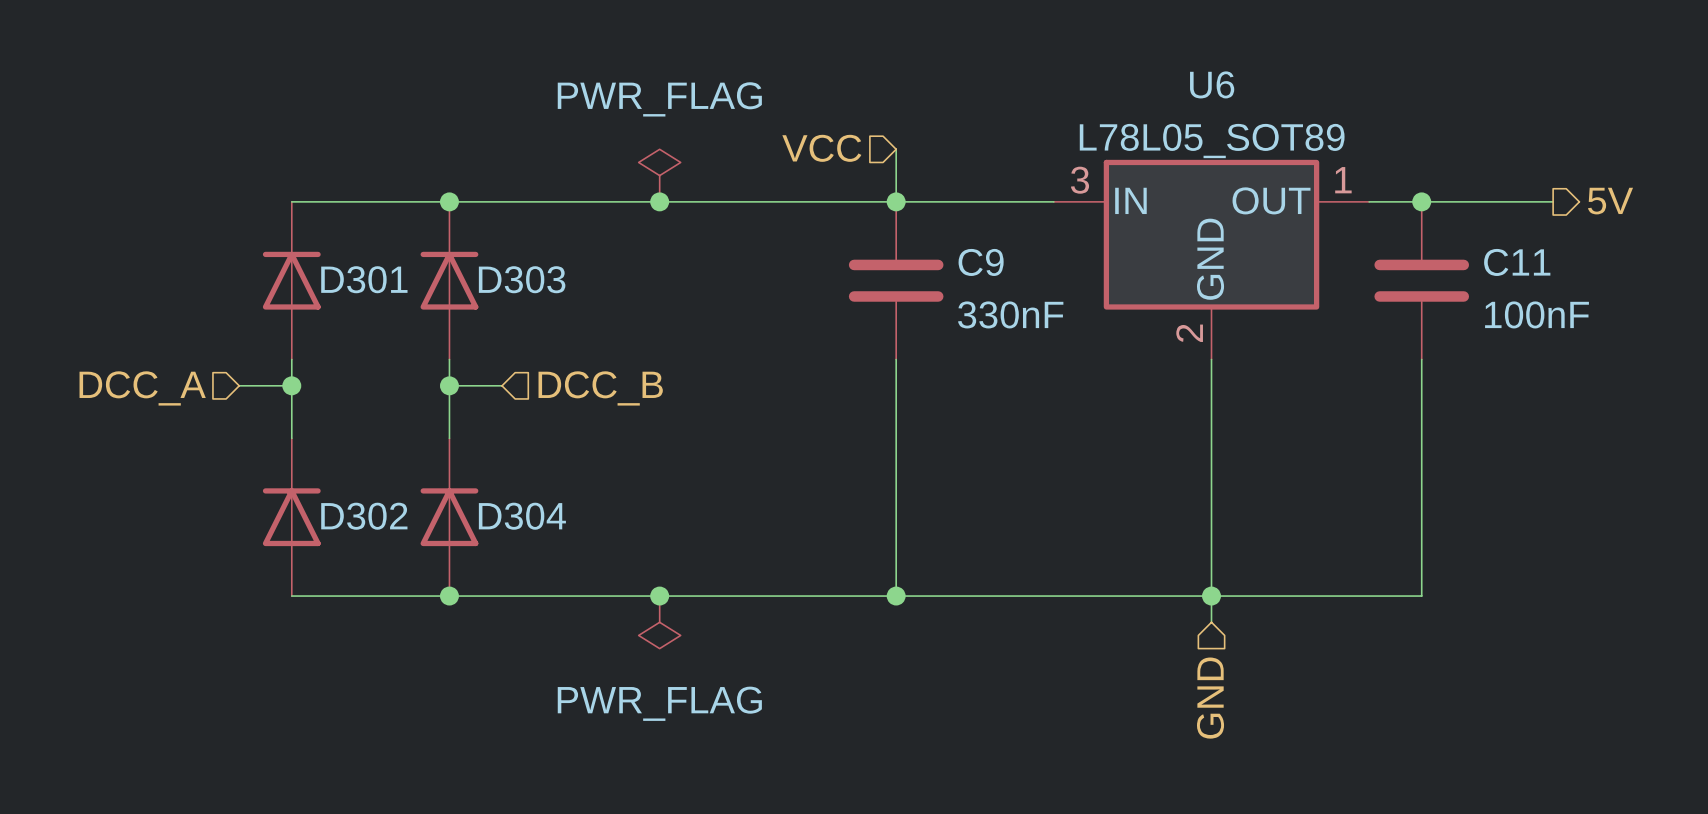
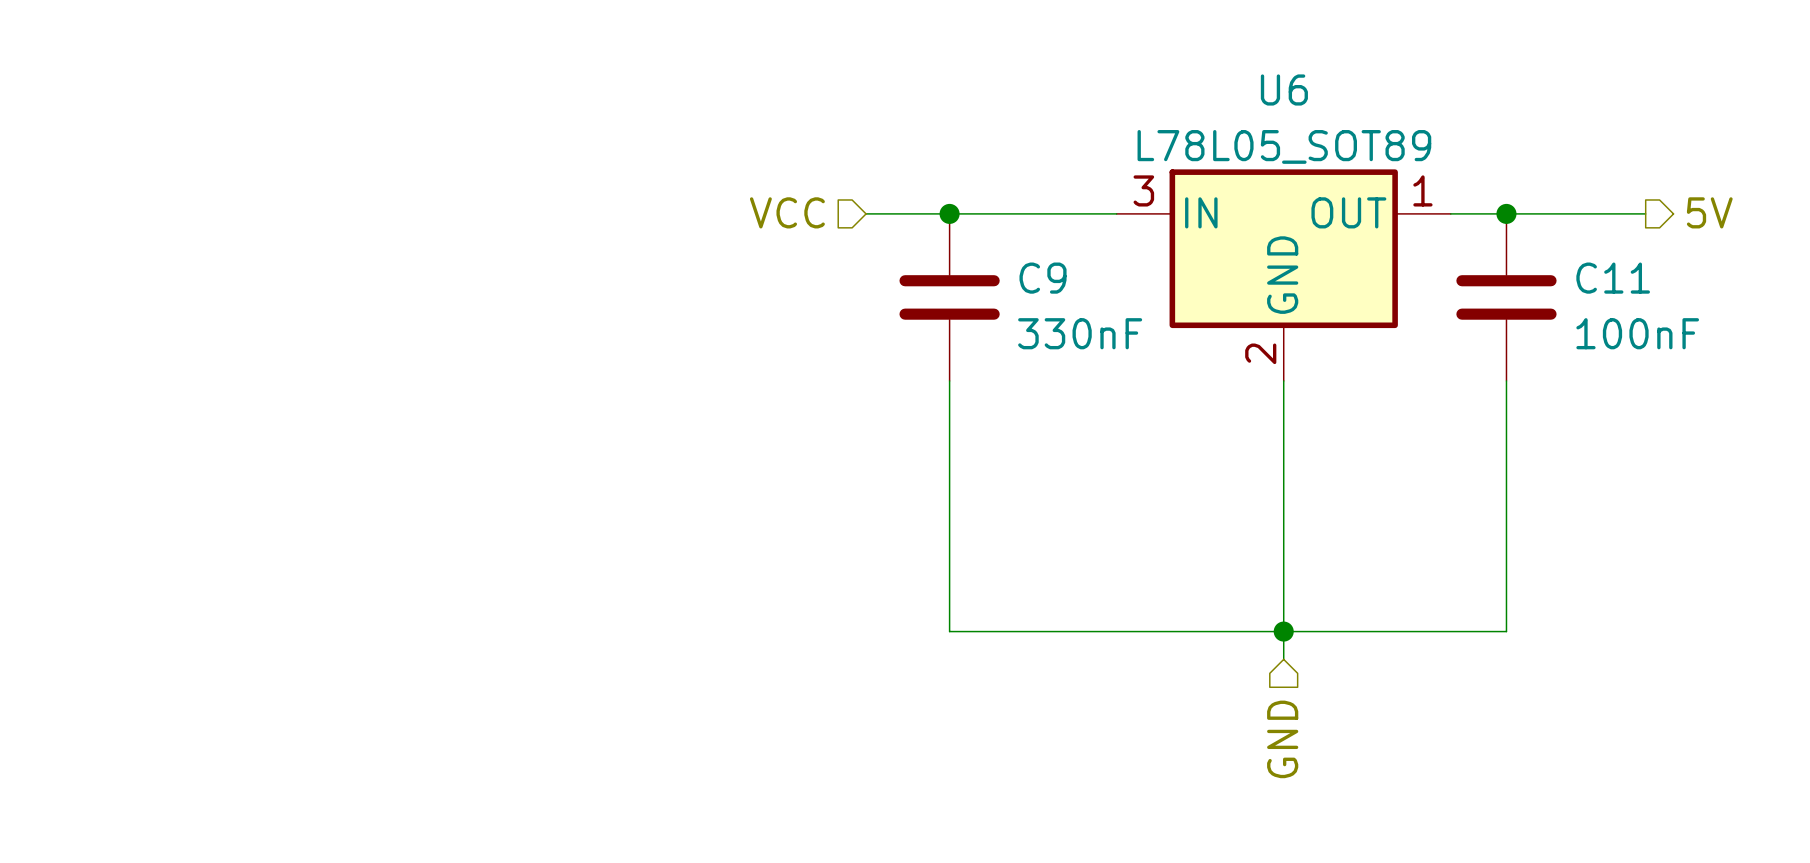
hierarchical label position: VCC (821, 148) -> VCC (787, 212)
wire: (896, 149) (896, 201) -> none
power symbol: PWR_FLAG (659, 175) -> none
wire: (291, 201) (817, 201) -> none
junction: (449, 201) -> none
junction: (659, 201) -> none
D301: (291, 280) -> none
D303: (449, 280) -> none
wire: (291, 359) (291, 438) -> none
wire: (449, 359) (449, 438) -> none
wire: (239, 385) (291, 385) -> none
junction: (291, 385) -> none
wire: (449, 385) (502, 385) -> none
junction: (449, 385) -> none
hierarchical label: DCC_A (142, 388) -> none
hierarchical label: DCC_B (600, 388) -> none
D302: (291, 517) -> none
D304: (449, 517) -> none
wire: (291, 596) (896, 596) -> none
junction: (449, 596) -> none
junction: (659, 596) -> none
junction: (896, 596) -> none
power symbol: PWR_FLAG (659, 622) -> none

